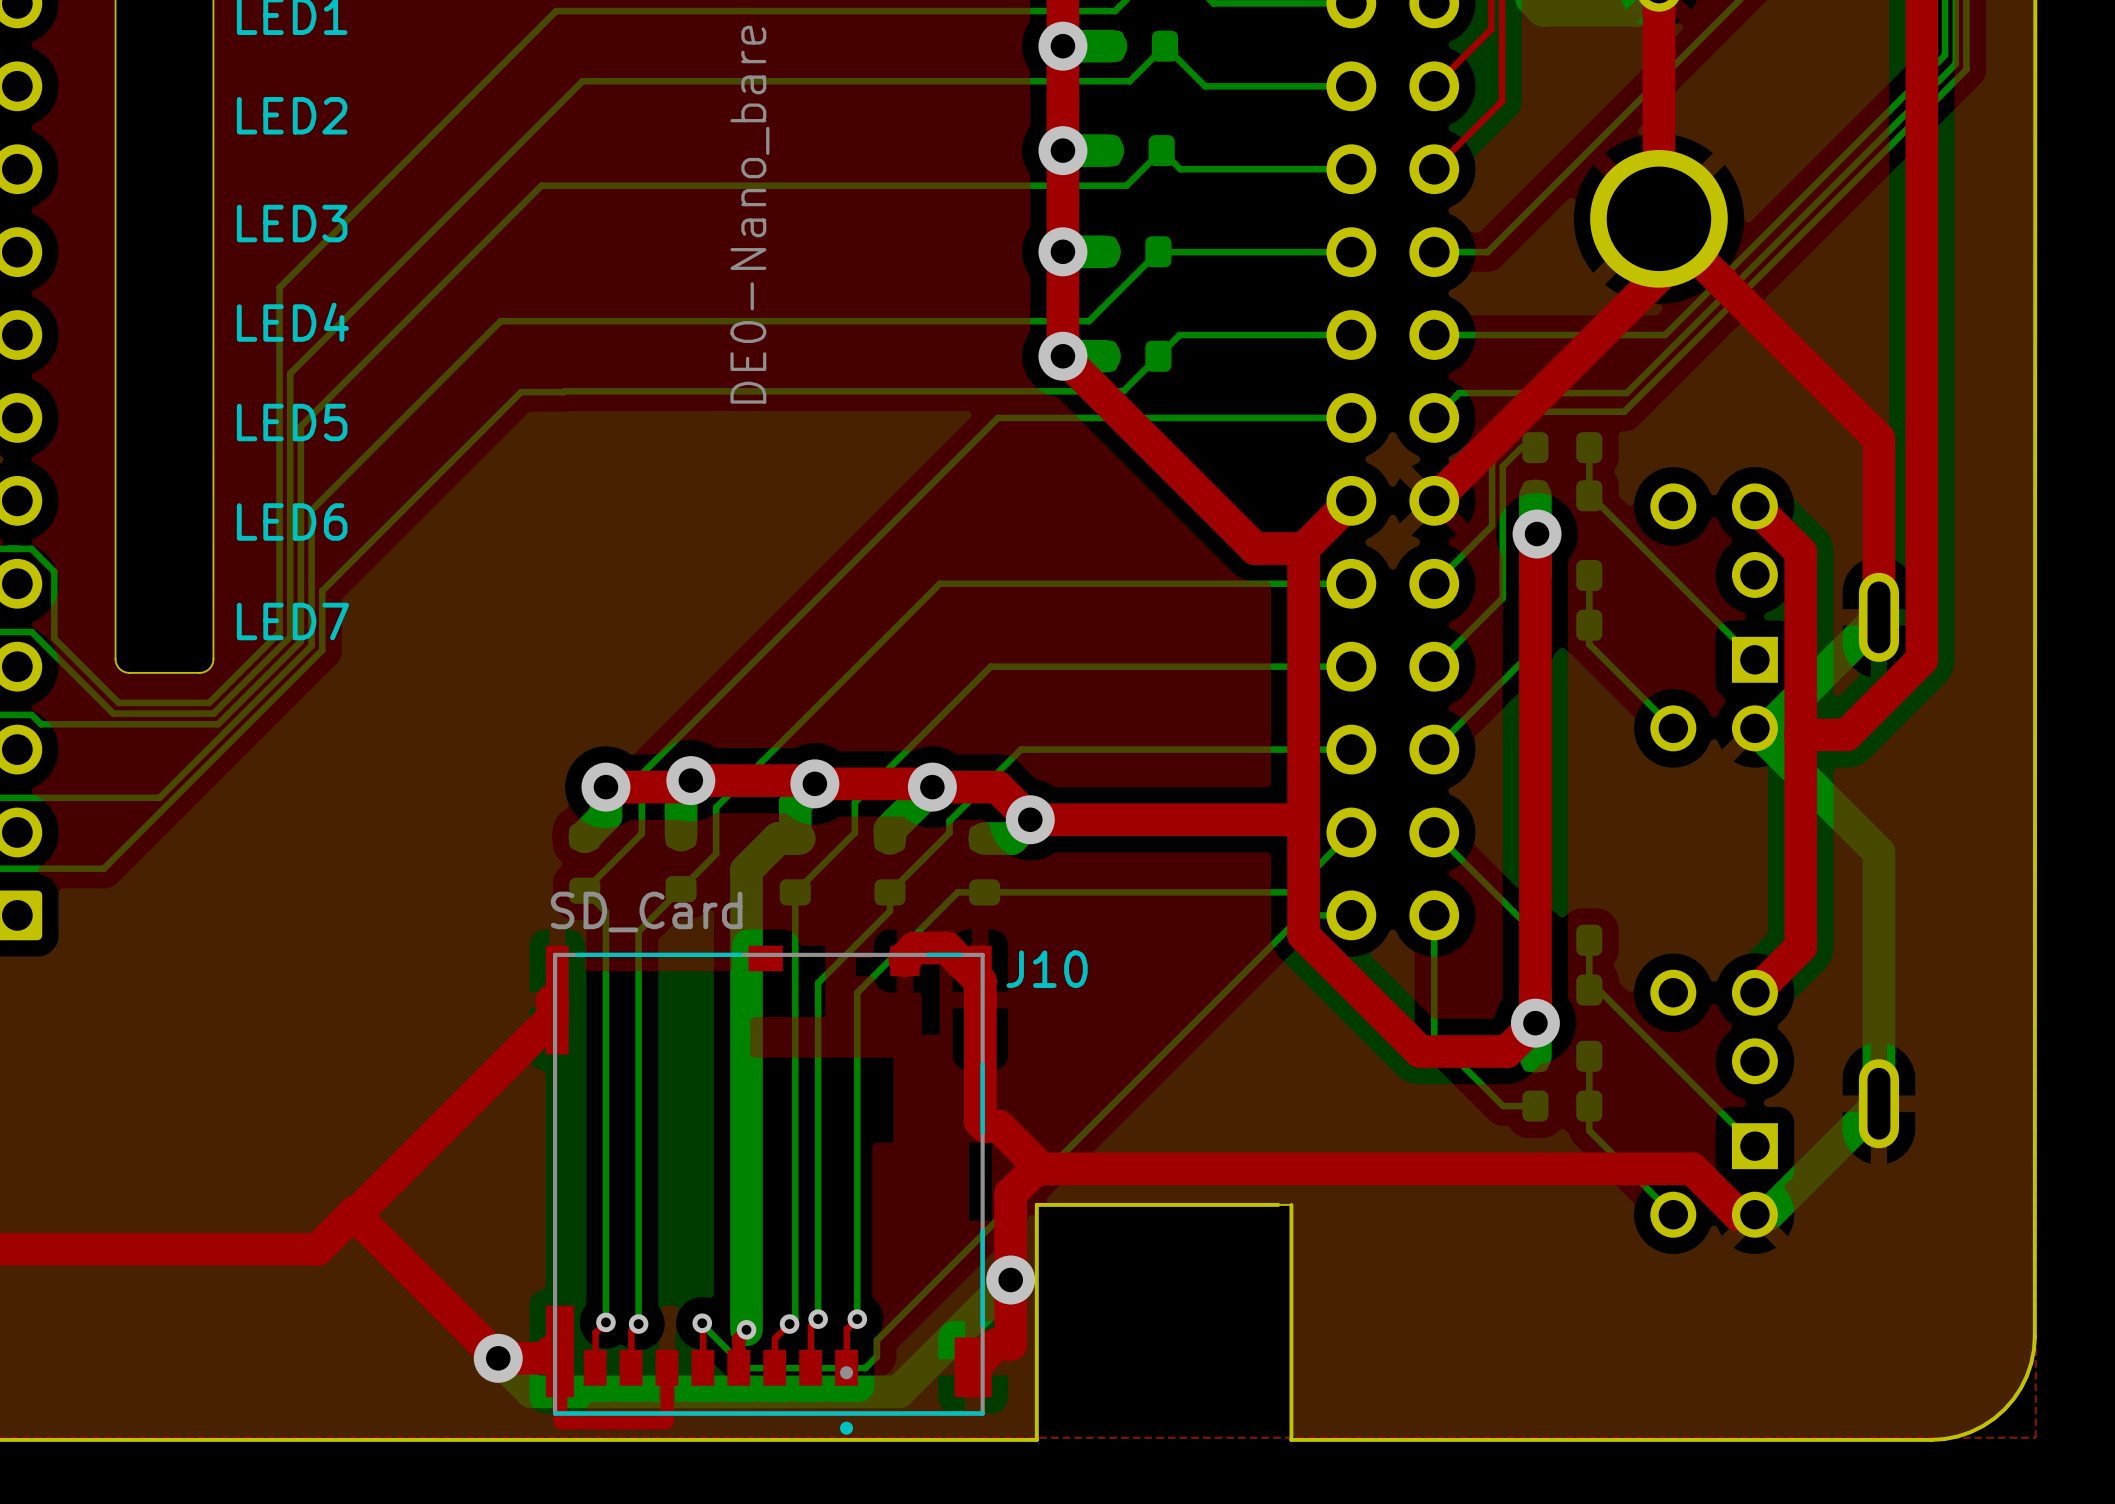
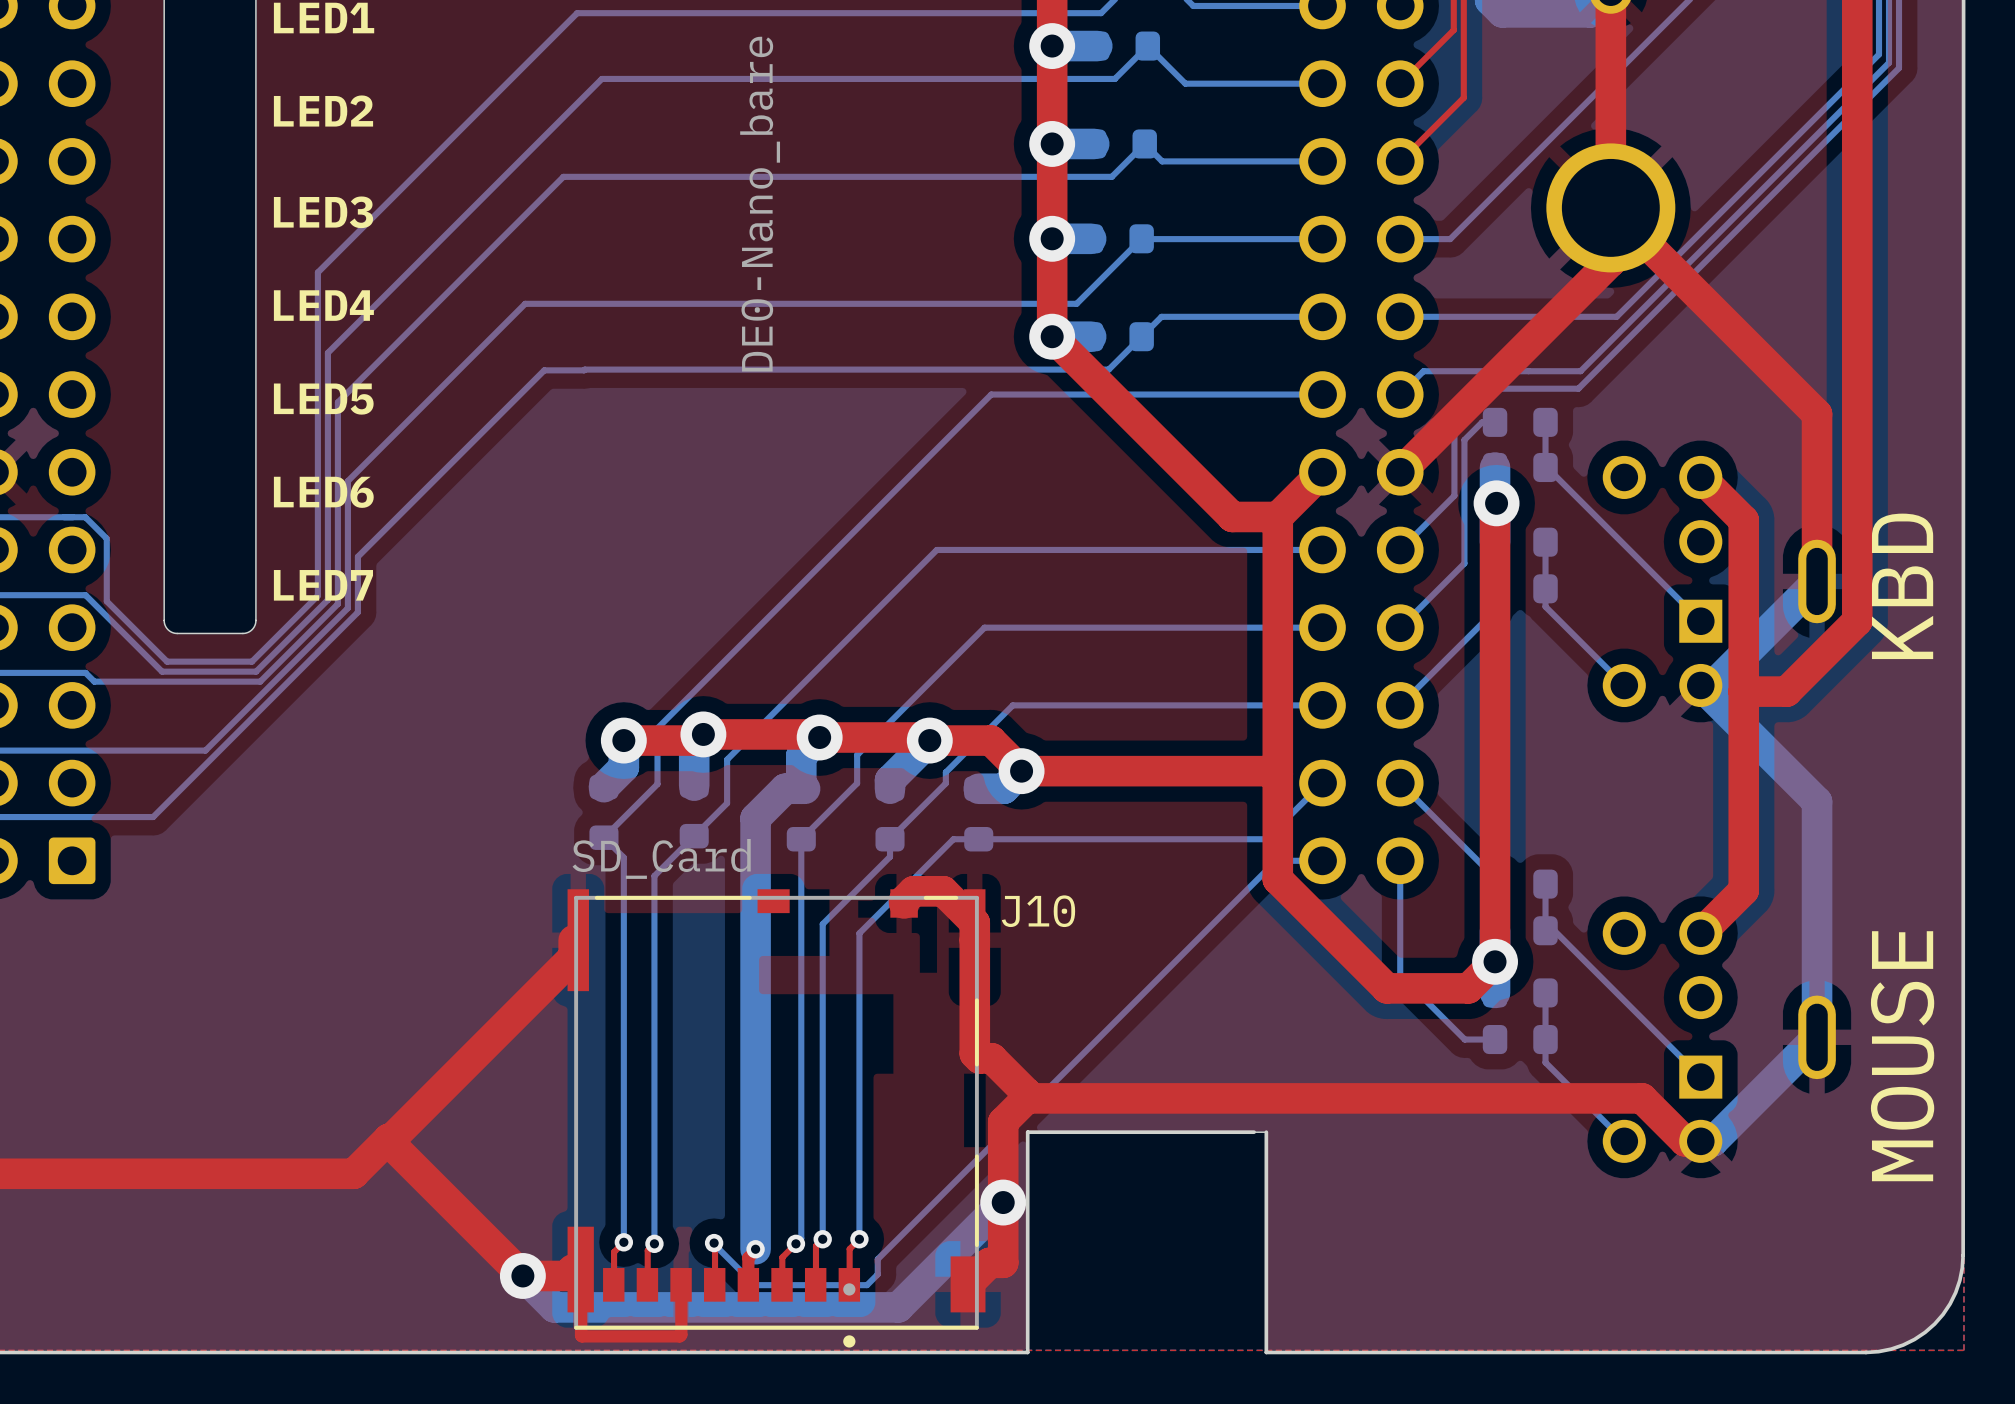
text: none -> KBD (1902, 586)
text: none -> MOUSE (1902, 1056)

